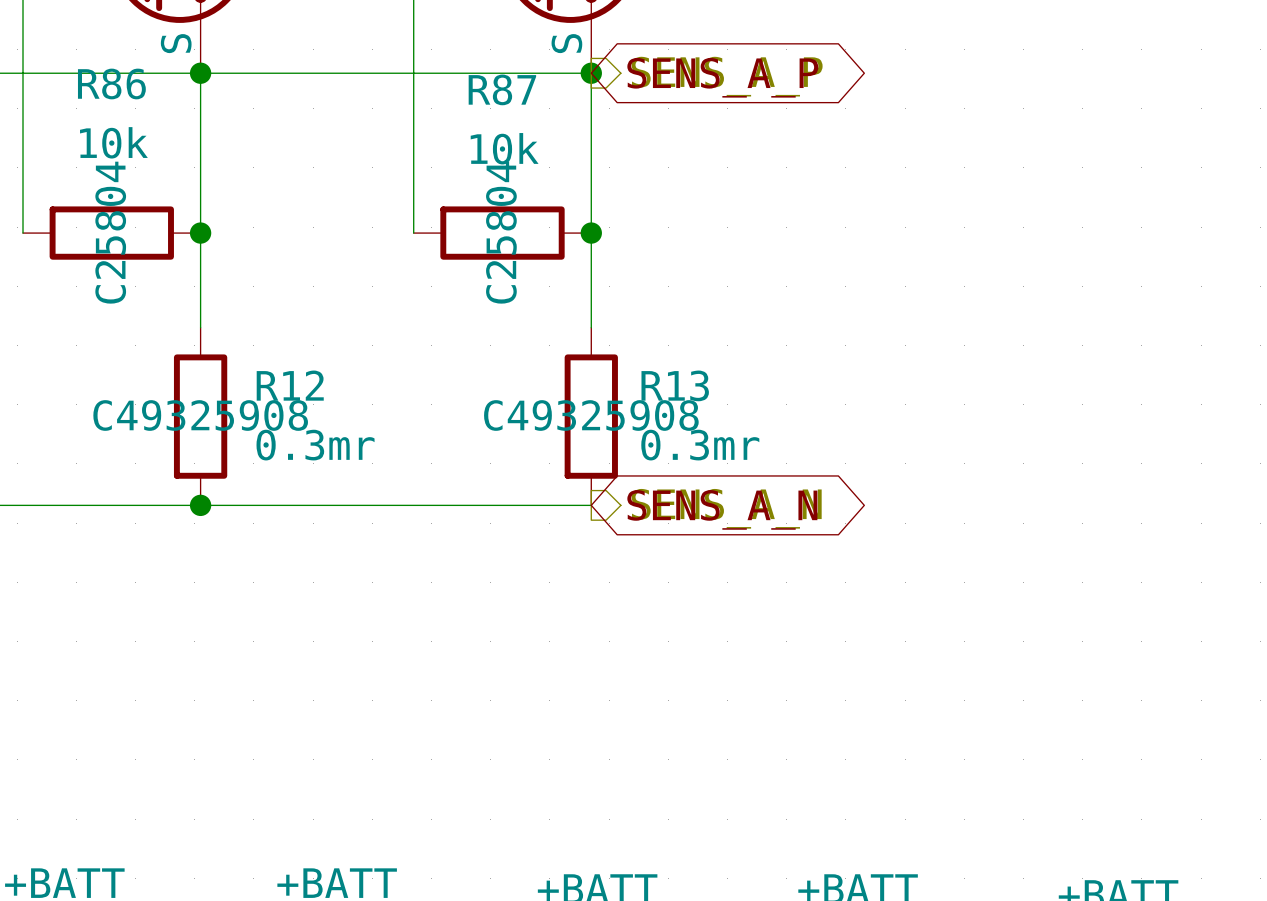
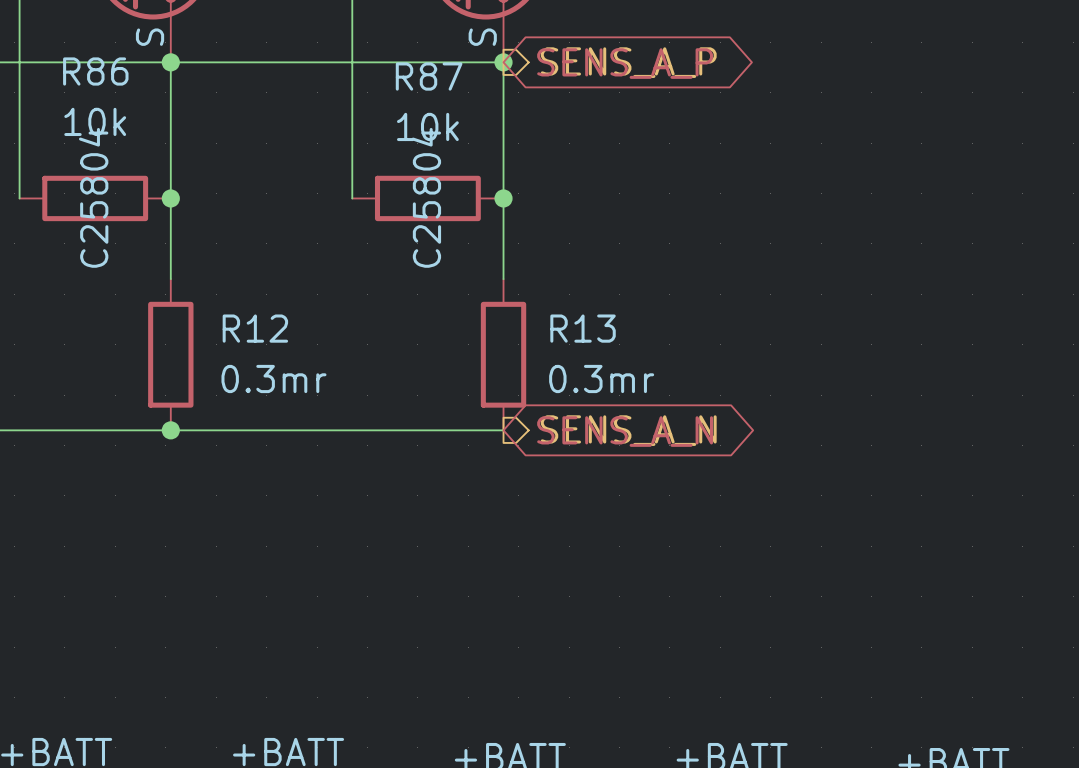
R12 text: C49325908 (200, 415) -> none
R13 text: C49325908 (591, 415) -> none

